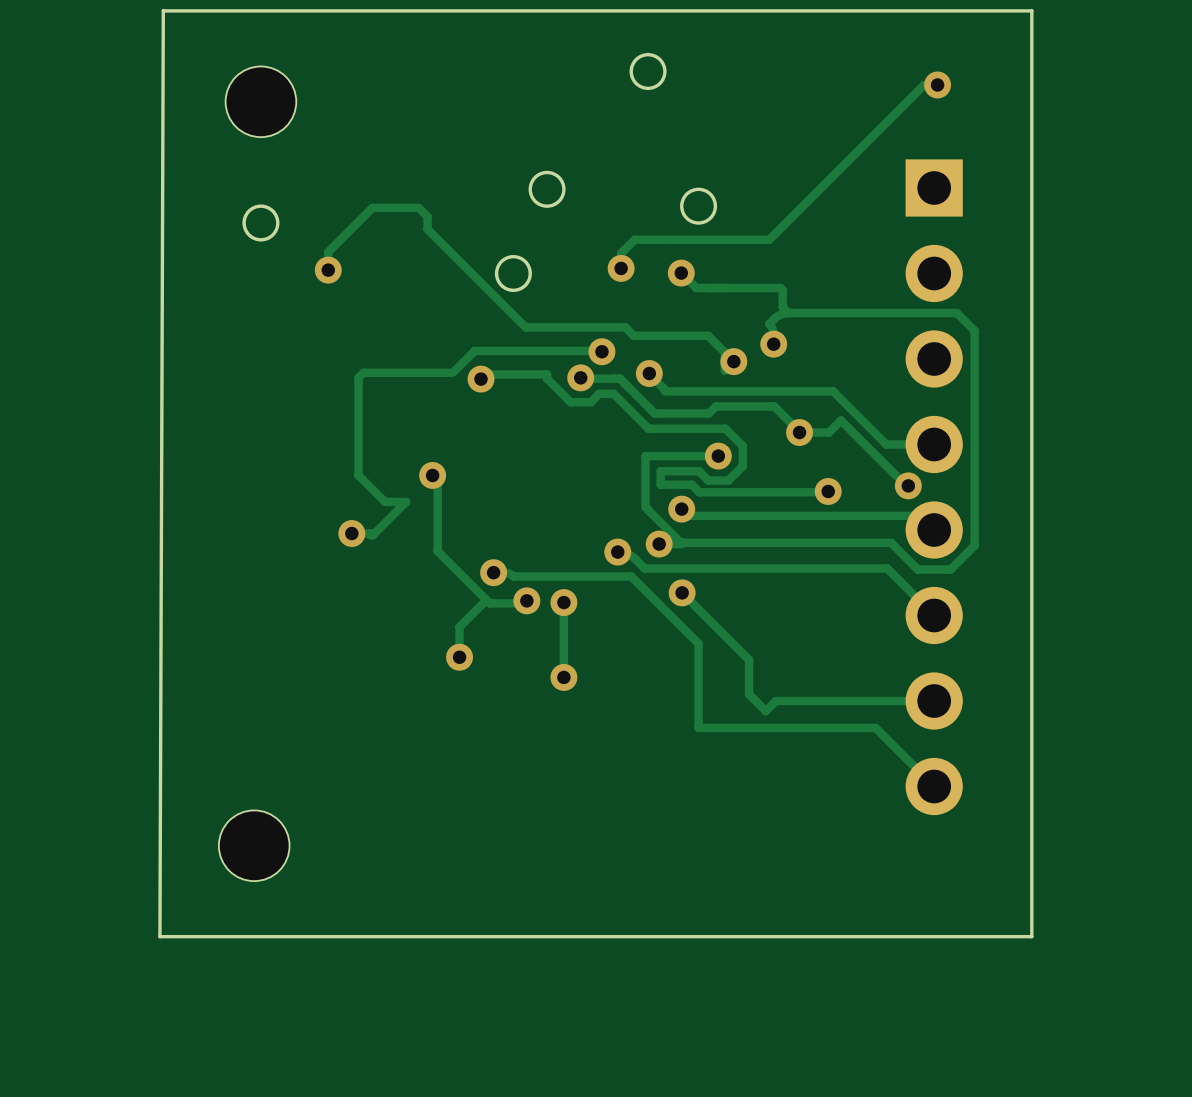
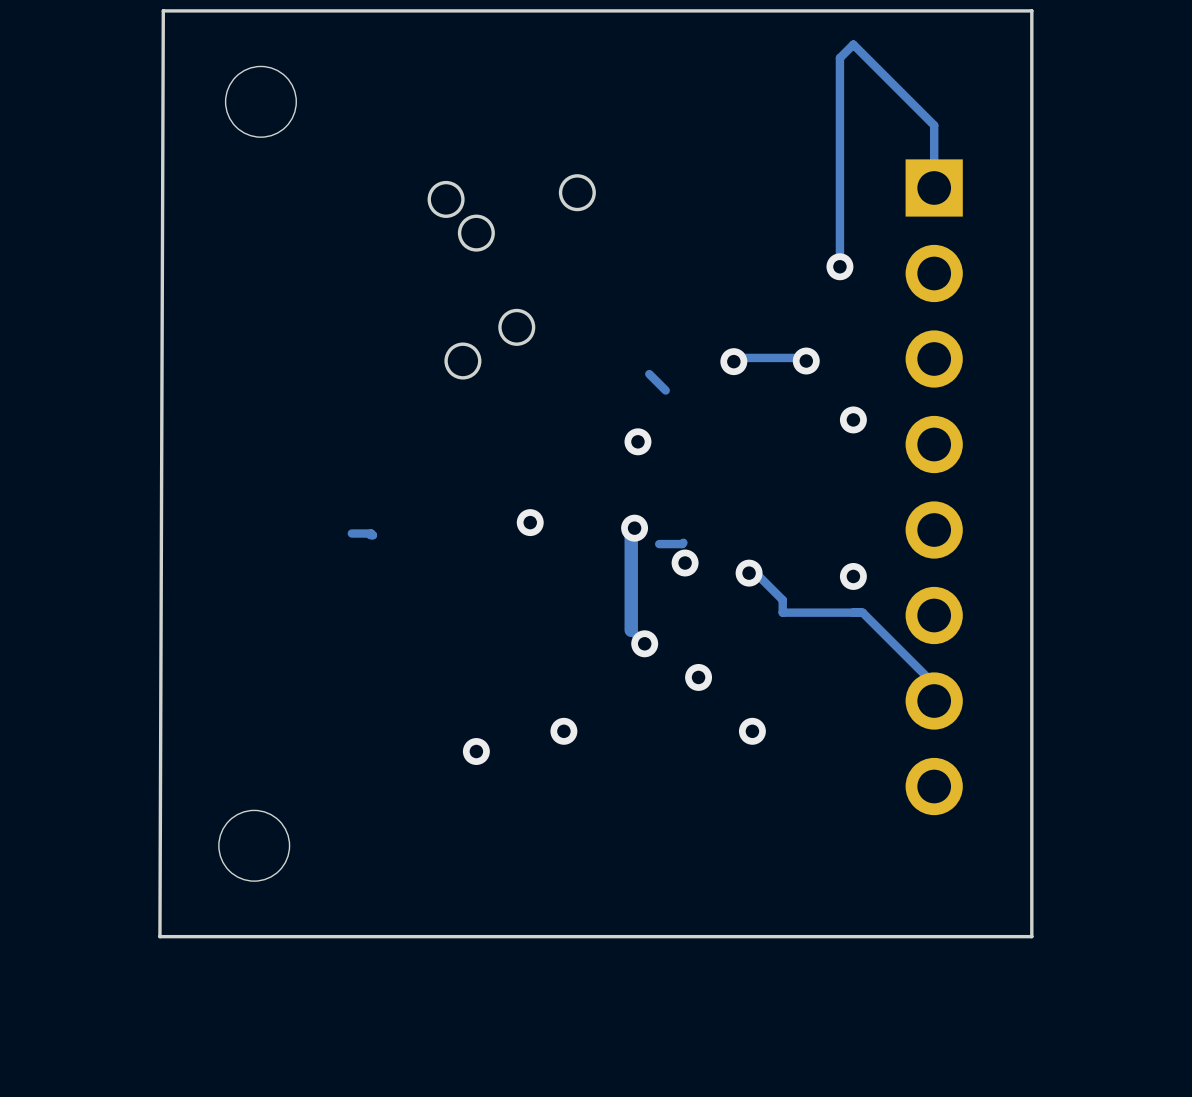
round board edge: [629, 53, 667, 91] -> none
track: (937, 84) (924, 84) (769, 239) (634, 239) (621, 253) (621, 268) -> none
via: (937, 84) -> none
round board edge: none -> [427, 180, 465, 218]
round board edge: [680, 187, 718, 225] -> none
track: none -> (934, 187) (934, 125) (853, 44) (839, 58) (839, 266)
round board edge position: (547, 189) -> (577, 192)
round board edge: [242, 204, 280, 242] -> none
round board edge: none -> [457, 214, 495, 252]
round board edge: [494, 254, 532, 293] -> none
via: none -> (839, 266)
via: (621, 268) -> none
track: (328, 270) (328, 252) (372, 207) (418, 207) (427, 216) (427, 229) (525, 327) (625, 327) (633, 335) (708, 335) (724, 352) (724, 370) (733, 361) -> none
via: (328, 270) -> none
track: (681, 273) (696, 288) (780, 288) (782, 290) (782, 307) (788, 313) -> none
via: (681, 273) -> none
round board edge: none -> [498, 308, 536, 346]
track: (788, 313) (956, 313) (974, 330) (974, 545) (950, 569) (917, 569) (891, 542) (680, 542) (648, 509) -> none
track: (788, 313) (779, 315) (769, 323) (773, 331) (773, 344) -> none
round board edge: none -> [444, 342, 482, 380]
via: (773, 344) -> none
track: (601, 351) (474, 350) (452, 372) -> none
via: (601, 351) -> none
track: none -> (738, 357) (803, 357) (806, 361)
via: none -> (806, 361)
track: (449, 372) (363, 372) (358, 377) (358, 475) (385, 501) (406, 501) (372, 535) -> none
via: (649, 373) -> none
track: (580, 377) (620, 378) (654, 413) (708, 413) (715, 406) (774, 406) (799, 432) (829, 432) (841, 420) (908, 485) -> none
via: (580, 377) -> none
track: (481, 379) (485, 374) (547, 374) (547, 378) (570, 402) (590, 402) (599, 393) (613, 393) (648, 428) (725, 428) (742, 445) (742, 466) (728, 480) (708, 480) (698, 471) (660, 471) (660, 484) (691, 484) (699, 492) (828, 491) -> none
via: (481, 379) -> none
track: (664, 391) (833, 391) (886, 444) (934, 444) -> none
via: none -> (853, 419)
via: (799, 432) -> none
via: none -> (637, 441)
track: (718, 456) (645, 456) (645, 507) -> none
via: (718, 456) -> none
track: (432, 475) (437, 481) (437, 551) (489, 603) (524, 603) (526, 600) -> none
via: (432, 475) -> none
via: (908, 485) -> none
via: (828, 491) -> none
track: (681, 509) (688, 515) (920, 515) (934, 530) -> none
via: (681, 509) -> none
via: none -> (530, 522)
track: none -> (634, 528) (634, 532) (631, 536) (631, 630) (644, 643)
via: none -> (634, 528)
via: (351, 533) -> none
via: (659, 544) -> none
track: (617, 552) (631, 556) (644, 568) (887, 568) (934, 615) -> none
via: (617, 552) -> none
via: none -> (685, 562)
track: (493, 572) (506, 572) (513, 576) (631, 576) (698, 643) (698, 727) (875, 727) (934, 786) -> none
via: (493, 572) -> none
via: none -> (749, 573)
via: none -> (853, 576)
track: (682, 592) (749, 659) (749, 694) (765, 711) (775, 701) (934, 701) -> (759, 576) (782, 600) (782, 612) (862, 612) (934, 684) (934, 701)
via: (682, 592) -> none
via: (526, 600) -> none
track: (563, 602) (563, 677) -> none
via: (563, 602) -> none
track: (483, 603) (459, 626) (459, 657) -> none
via: none -> (644, 643)
via: (459, 657) -> none
via: (563, 677) -> none
via: none -> (698, 677)
via: none -> (563, 731)
via: none -> (752, 731)
via: none -> (476, 751)

